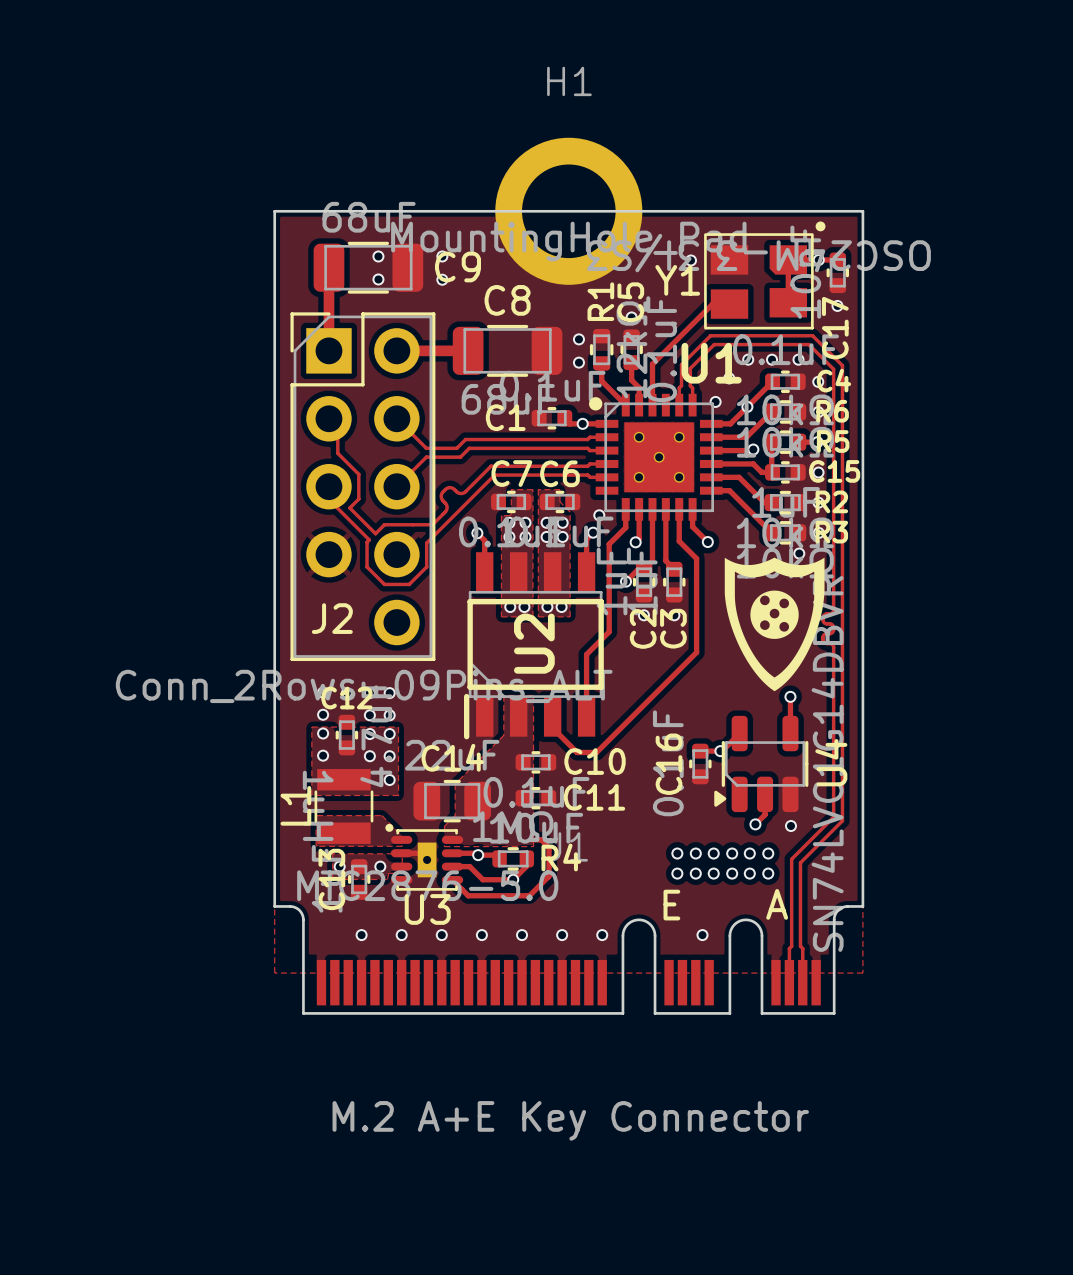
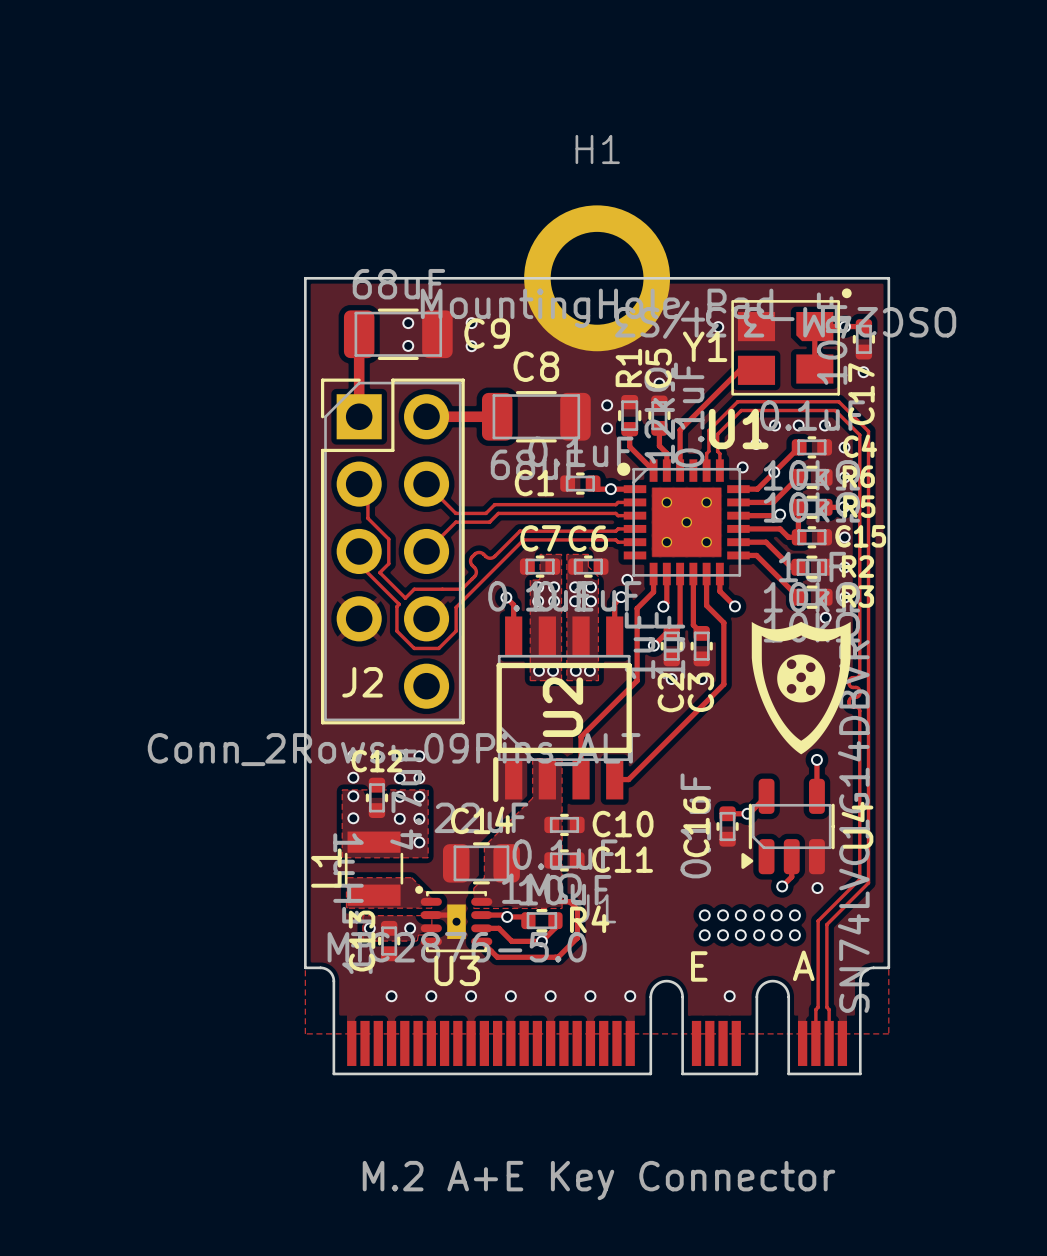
track: (609, 617) (609, 631) (586, 654) (586, 716) -> (637, 680) (581, 736) (581, 779)
track: (696, 620) (696, 652) (596, 752) (577, 752) (552, 728) -> (723, 684) (628, 779) (614, 779)

